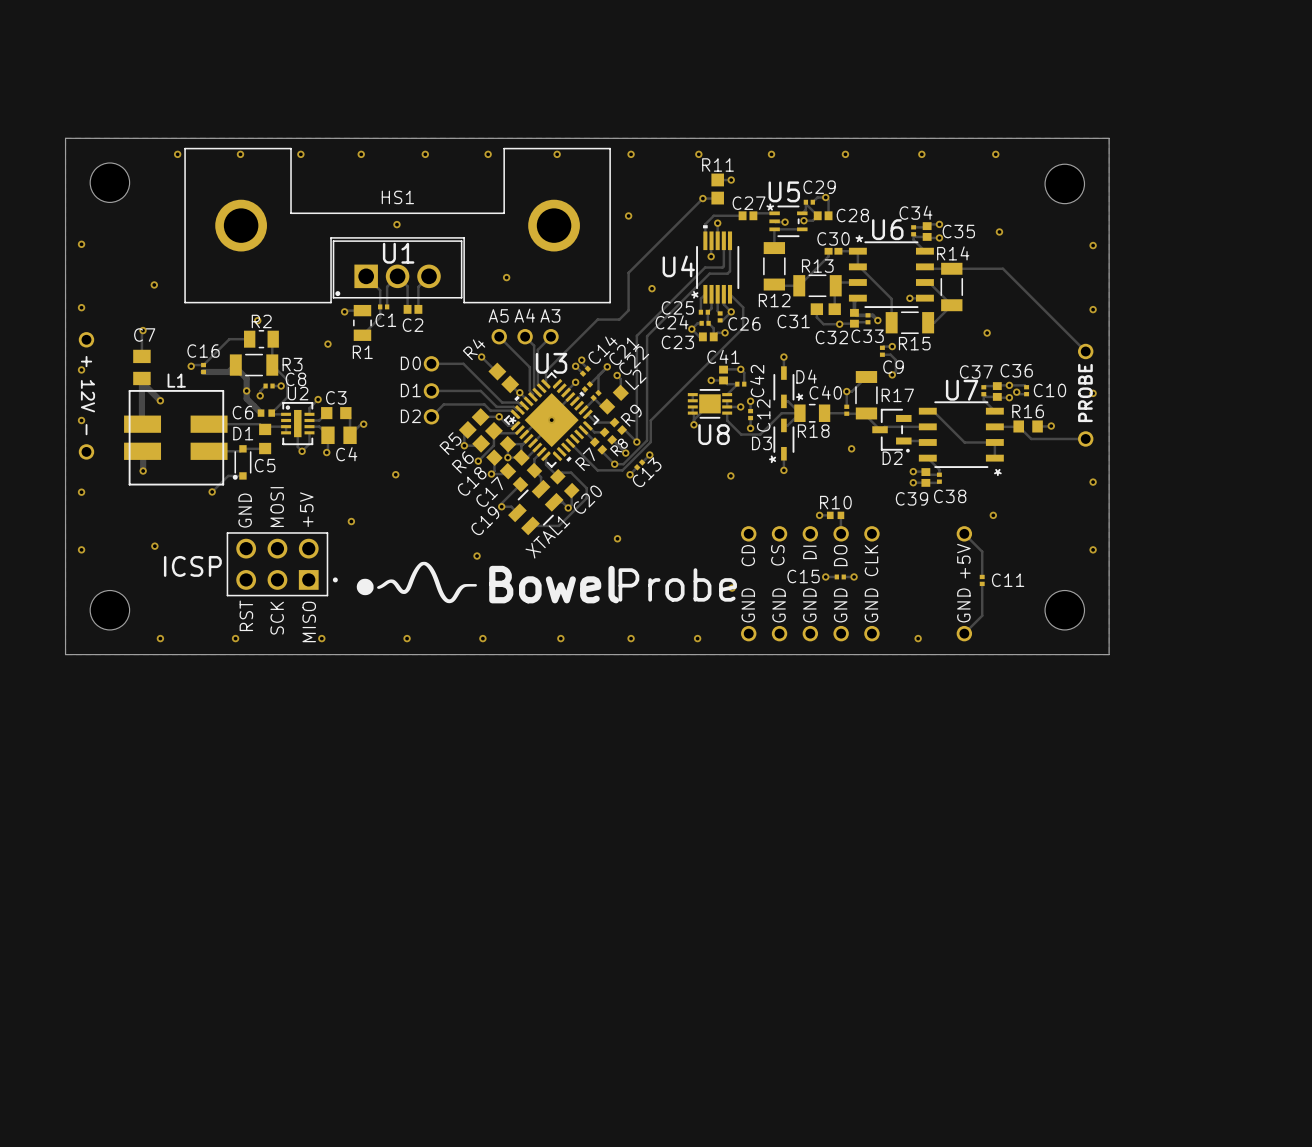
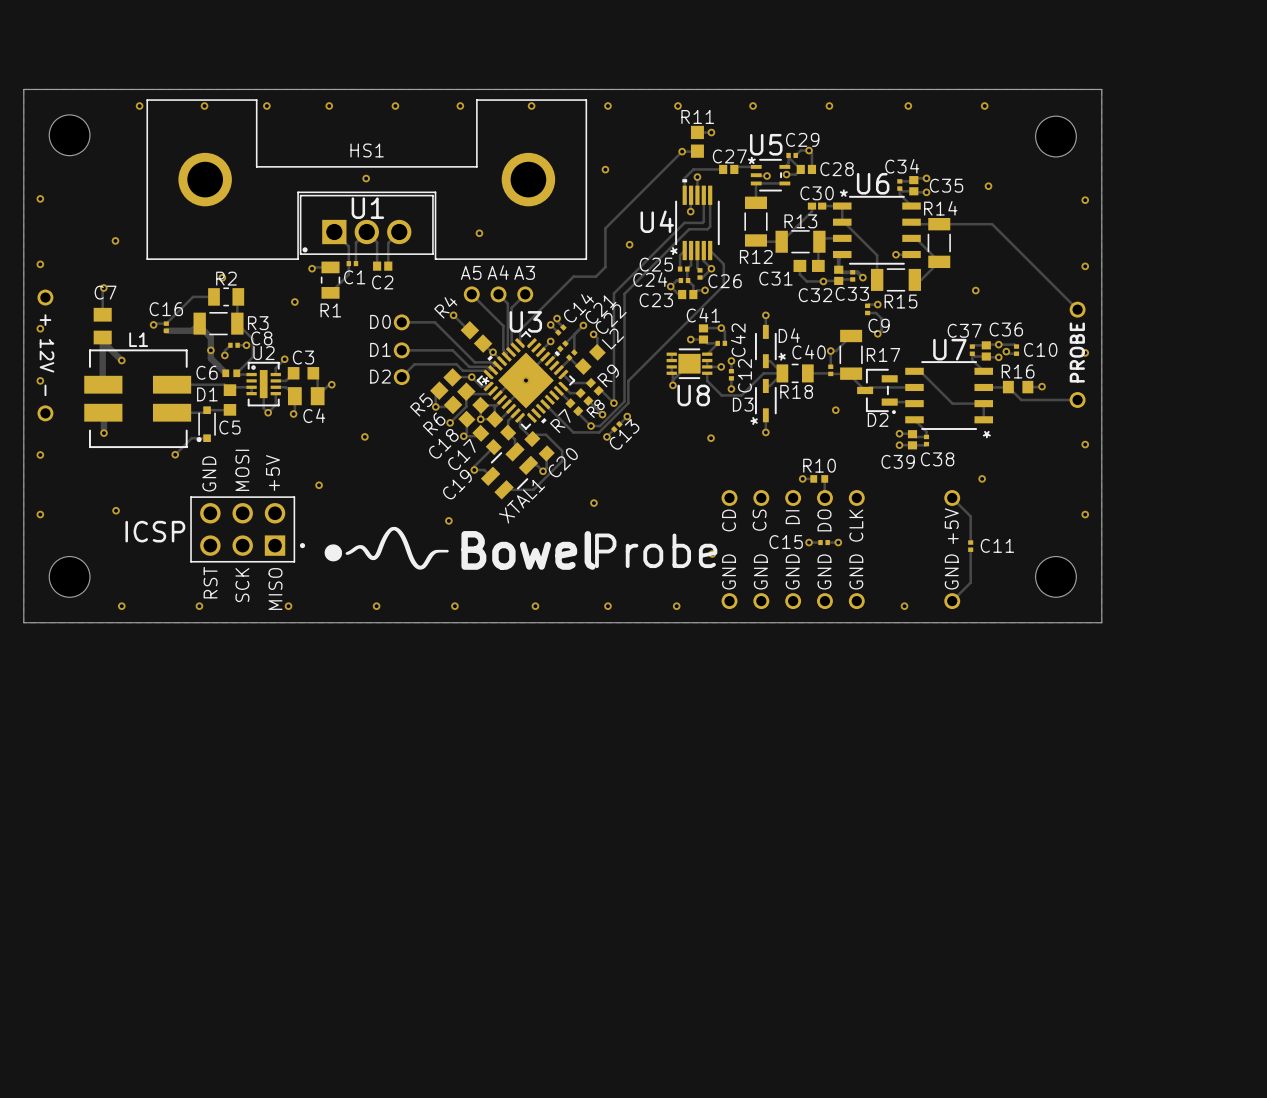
L1 footprint: [124, 389, 228, 486] -> [84, 349, 192, 449]

